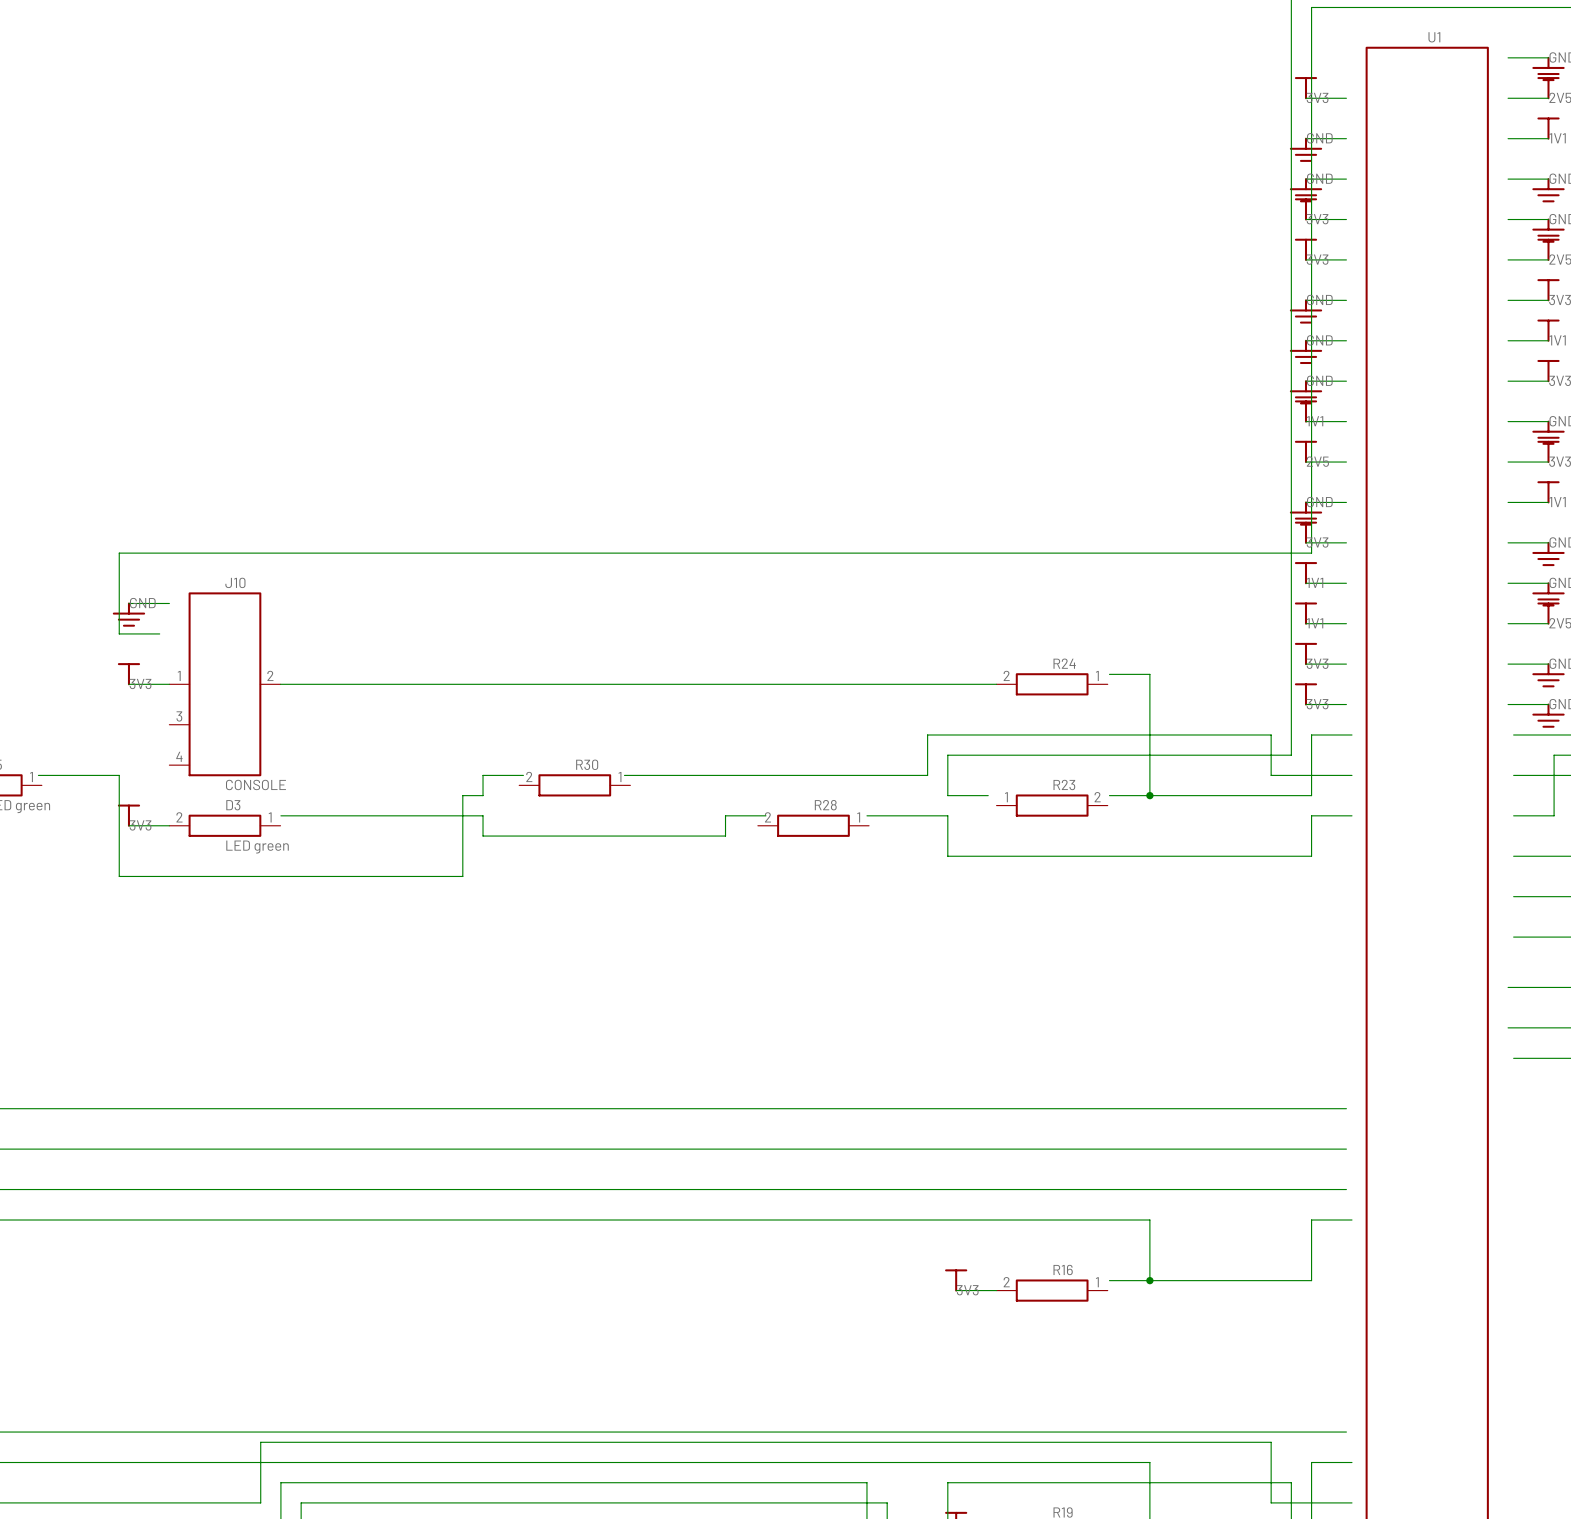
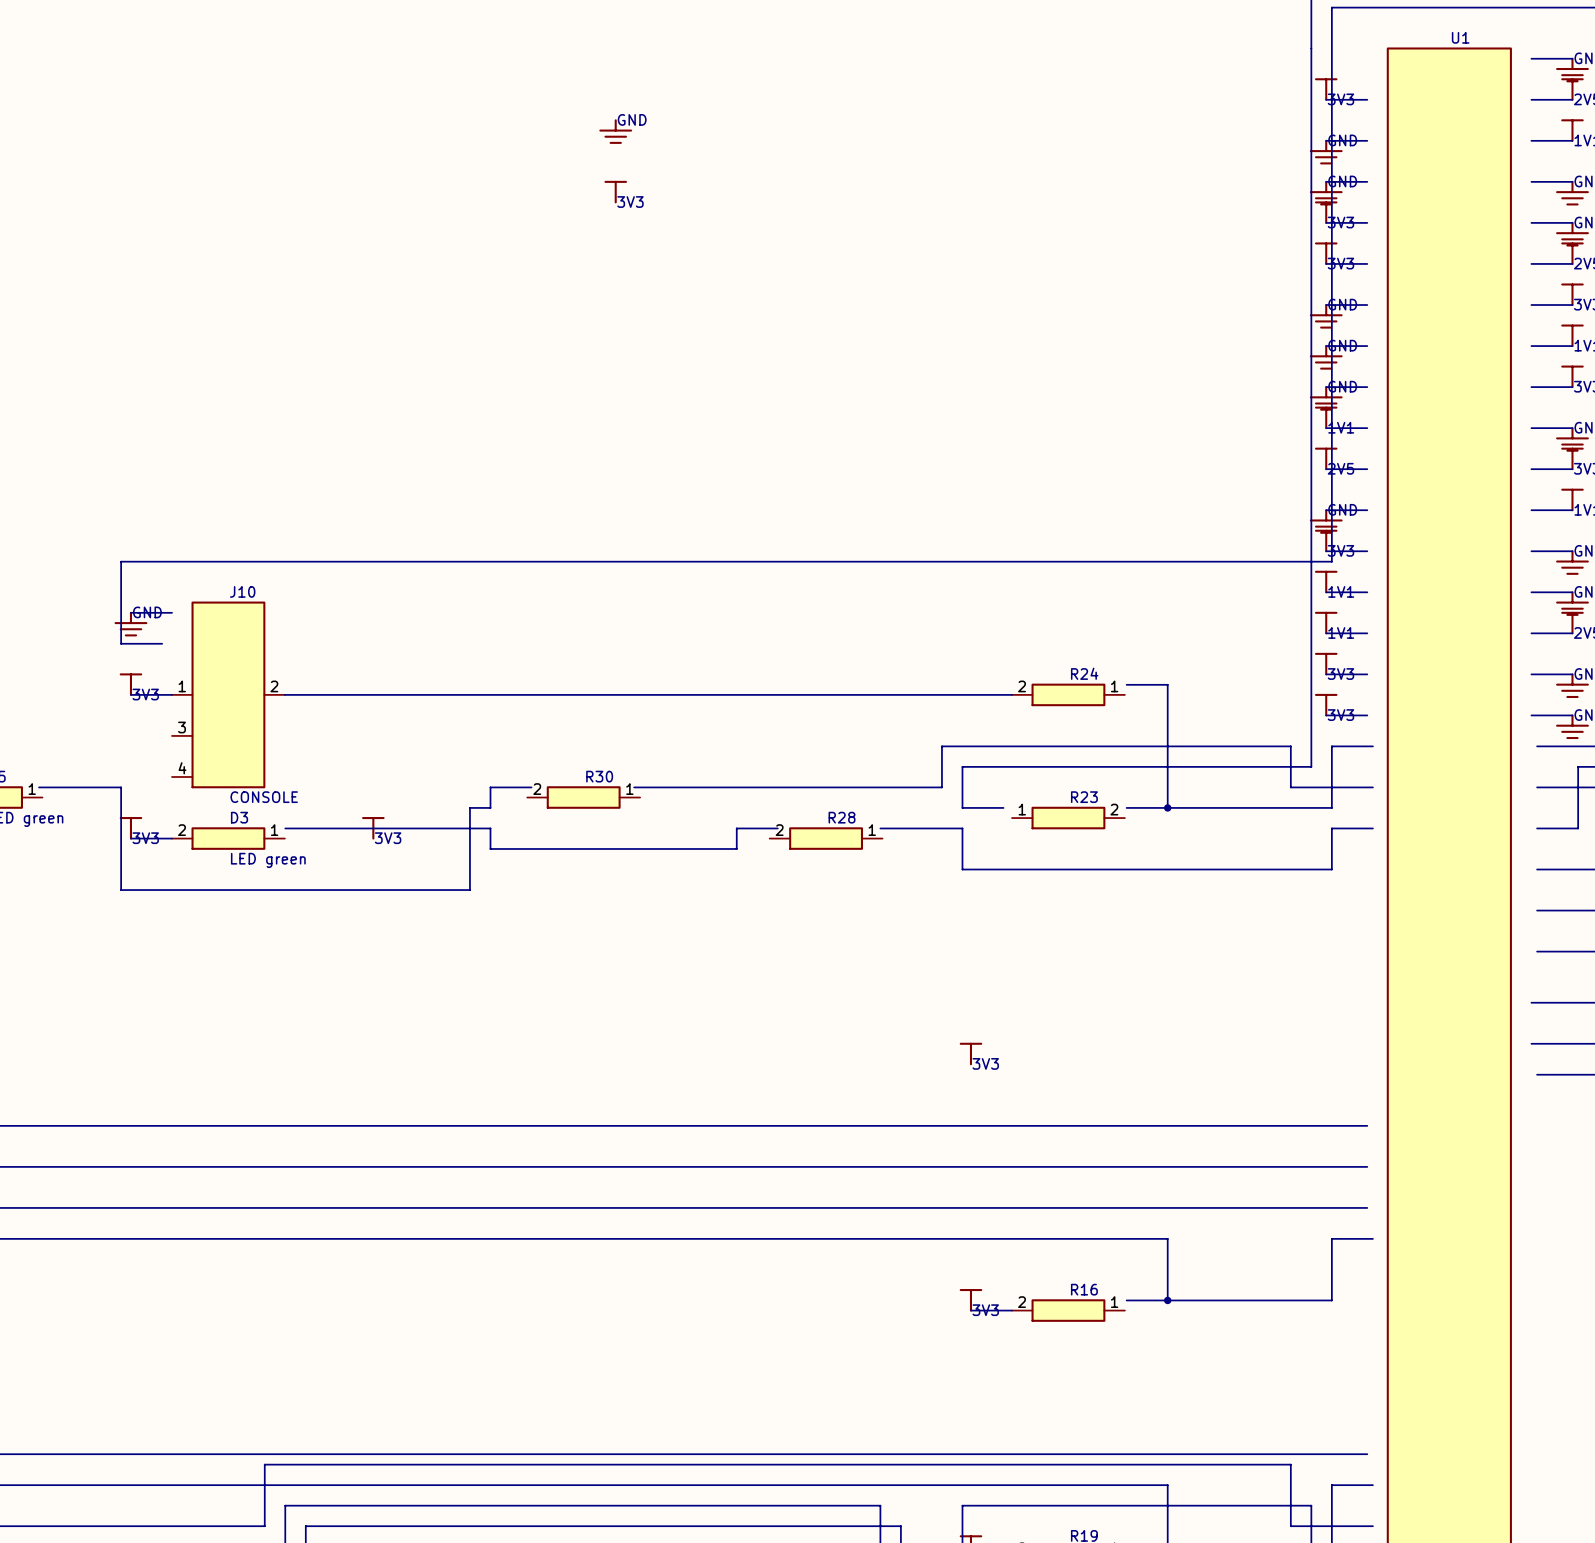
power symbol: none -> GND (615, 131)
power symbol: none -> 3V3 (615, 192)
power symbol: none -> 3V3 (373, 828)
power symbol: none -> 3V3 (970, 1054)

